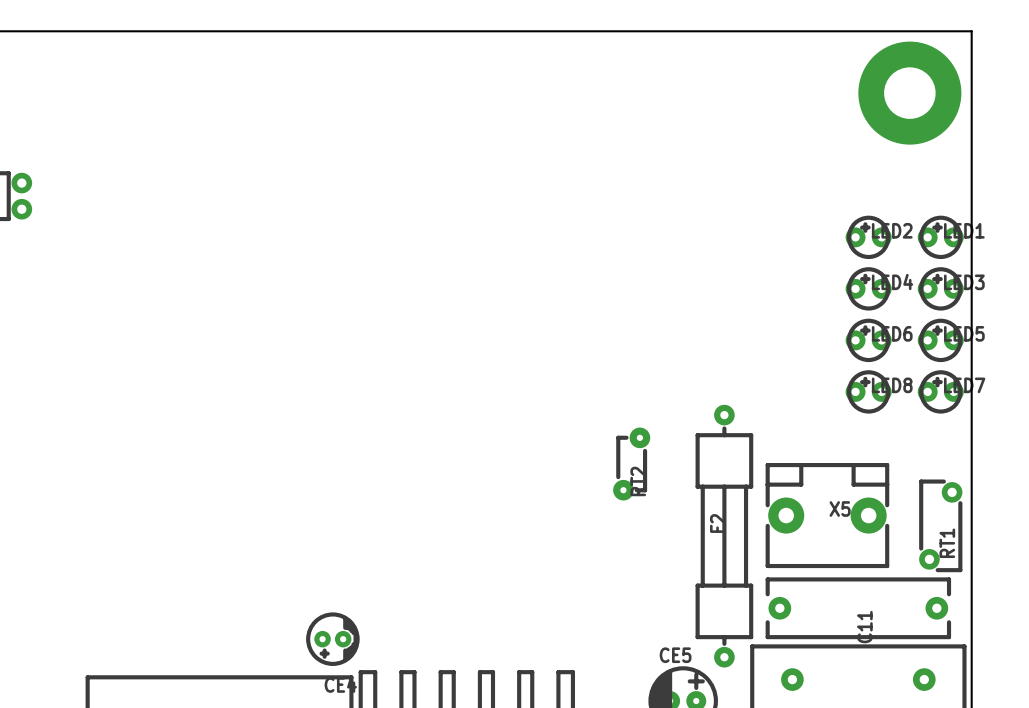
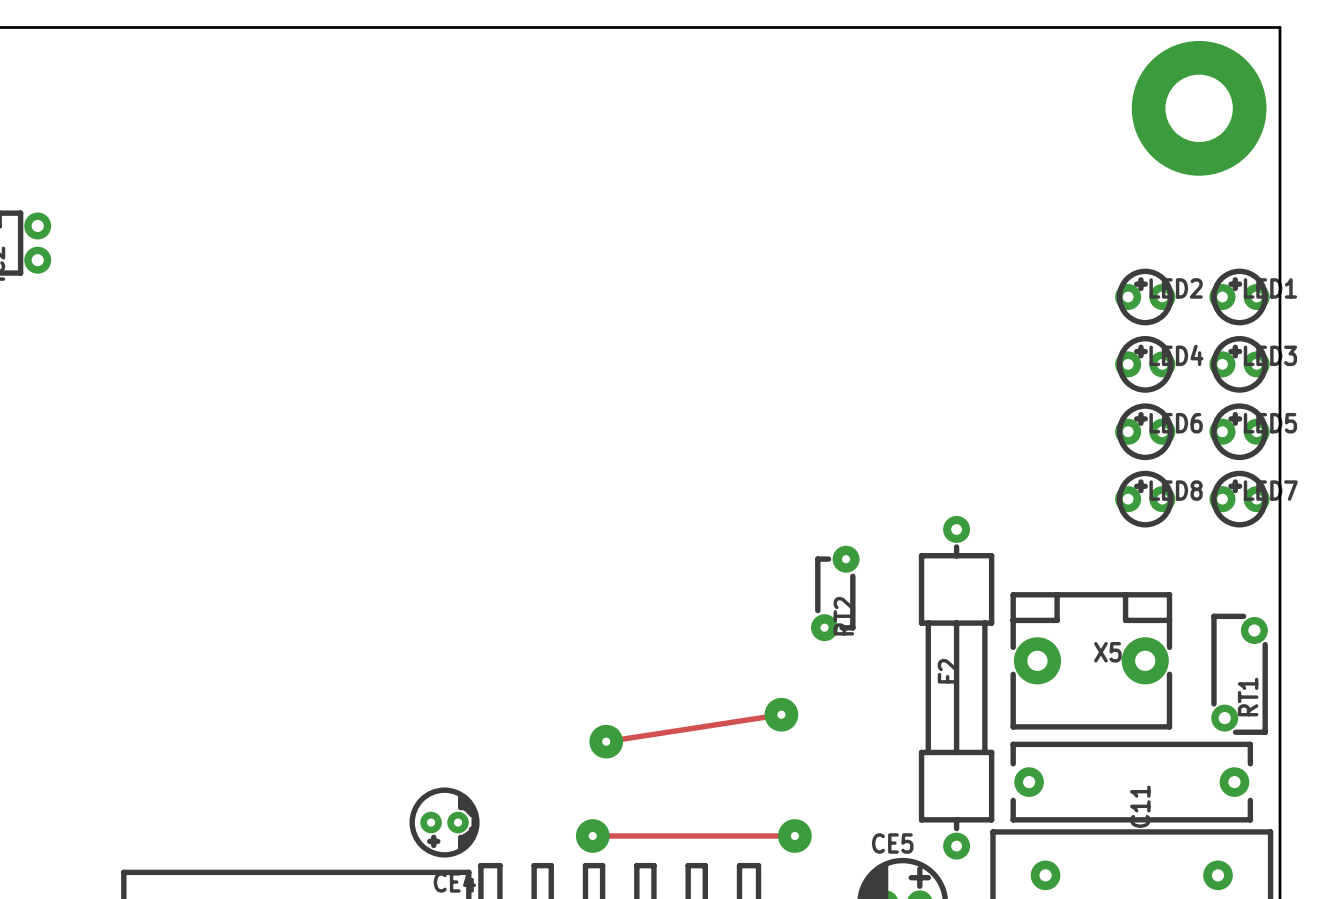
track: none -> (781, 714) (606, 741)
via: none -> (781, 714)
via: none -> (606, 741)
track: none -> (592, 836) (794, 836)
via: none -> (592, 836)
via: none -> (794, 836)

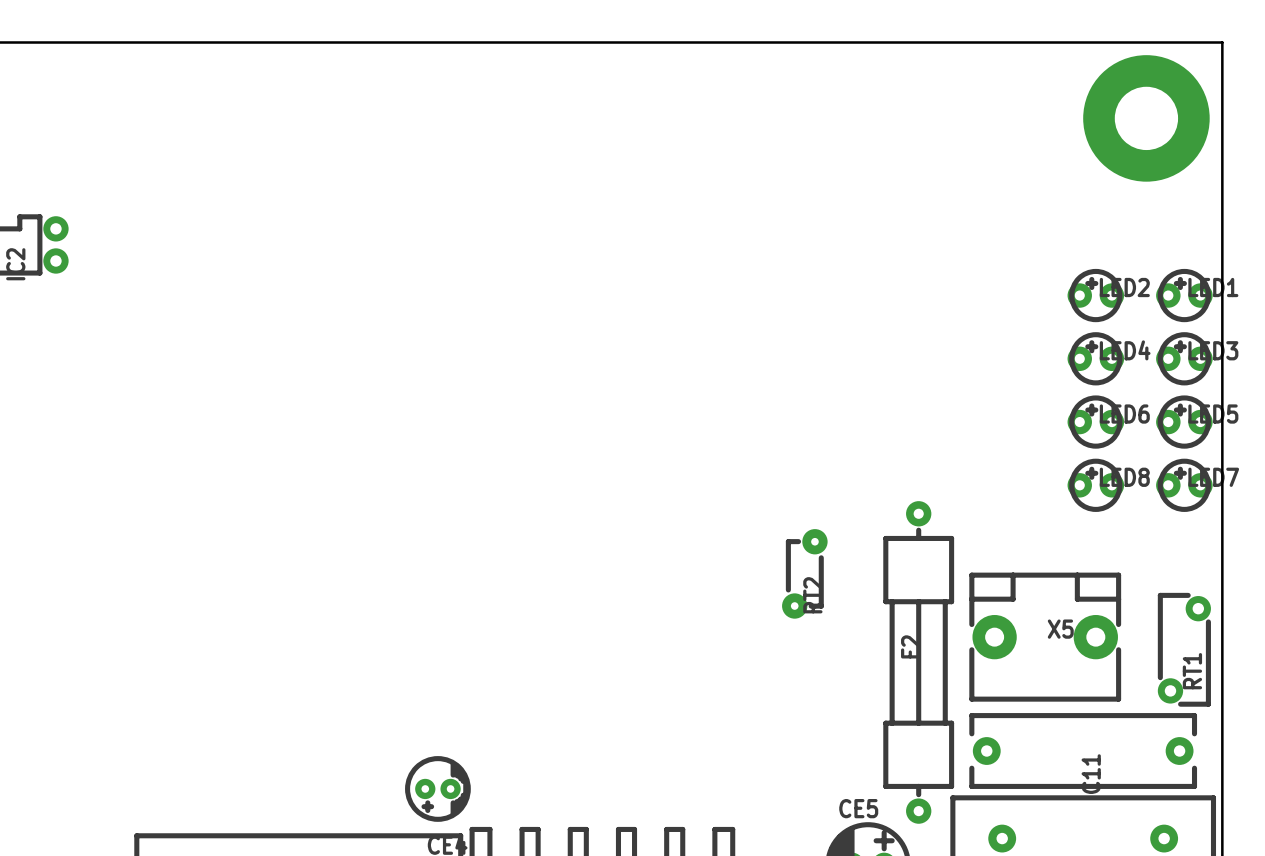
track: (781, 714) (606, 741) -> none
via: (781, 714) -> none
via: (606, 741) -> none
track: (592, 836) (794, 836) -> none
via: (592, 836) -> none
via: (794, 836) -> none

